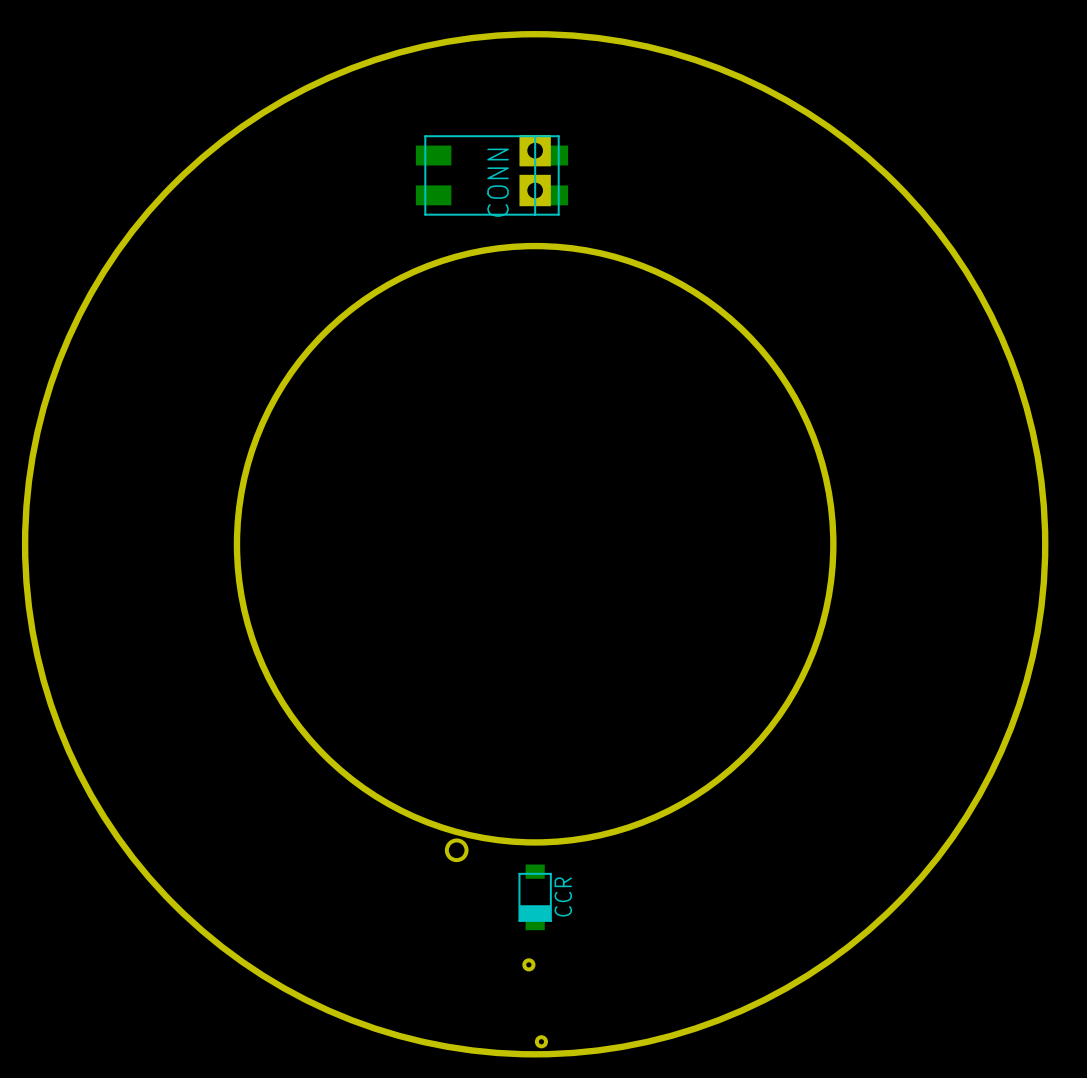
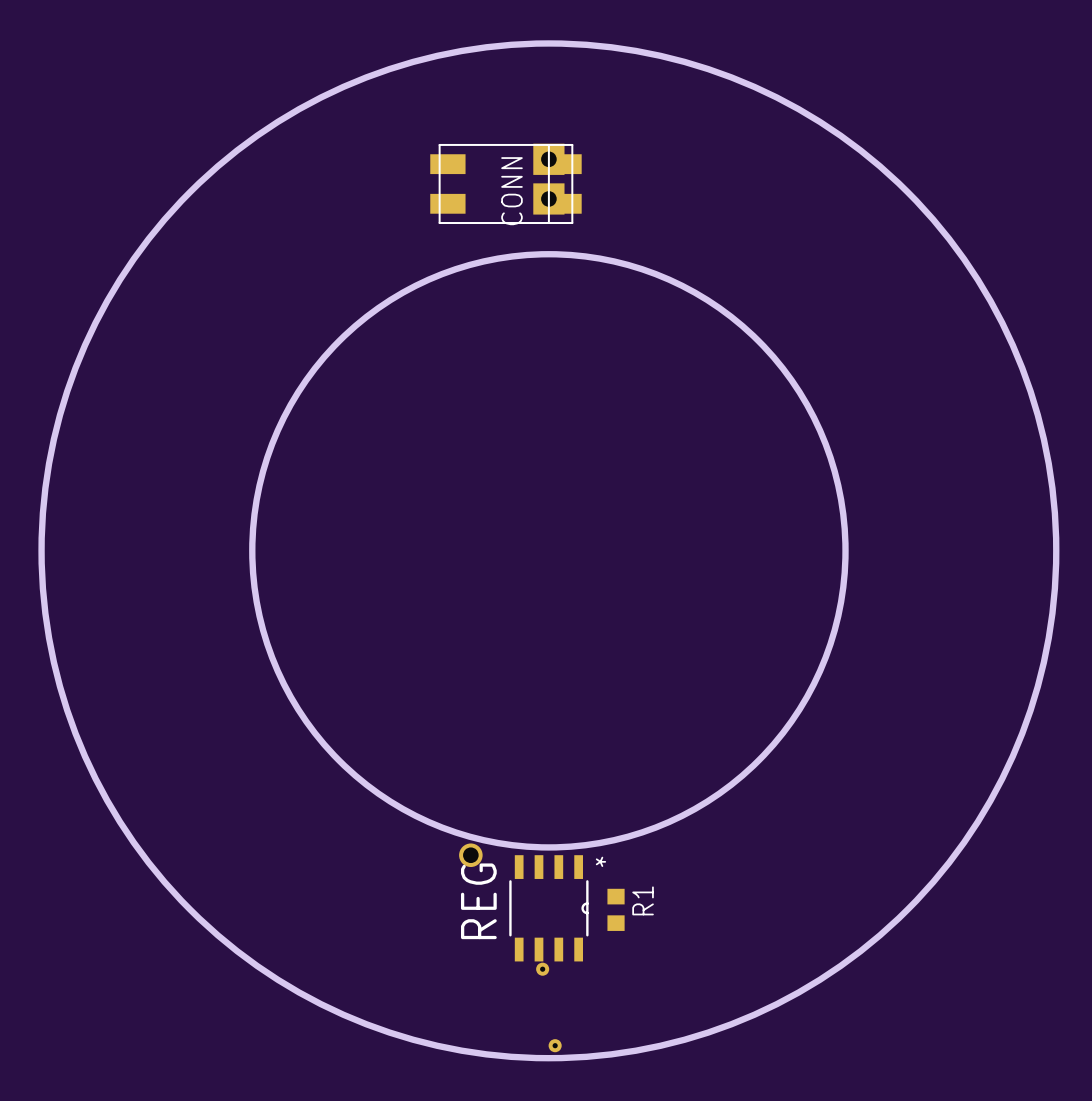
CCR: (535, 897) -> none
REG: none -> (548, 908)
R1: none -> (616, 909)

